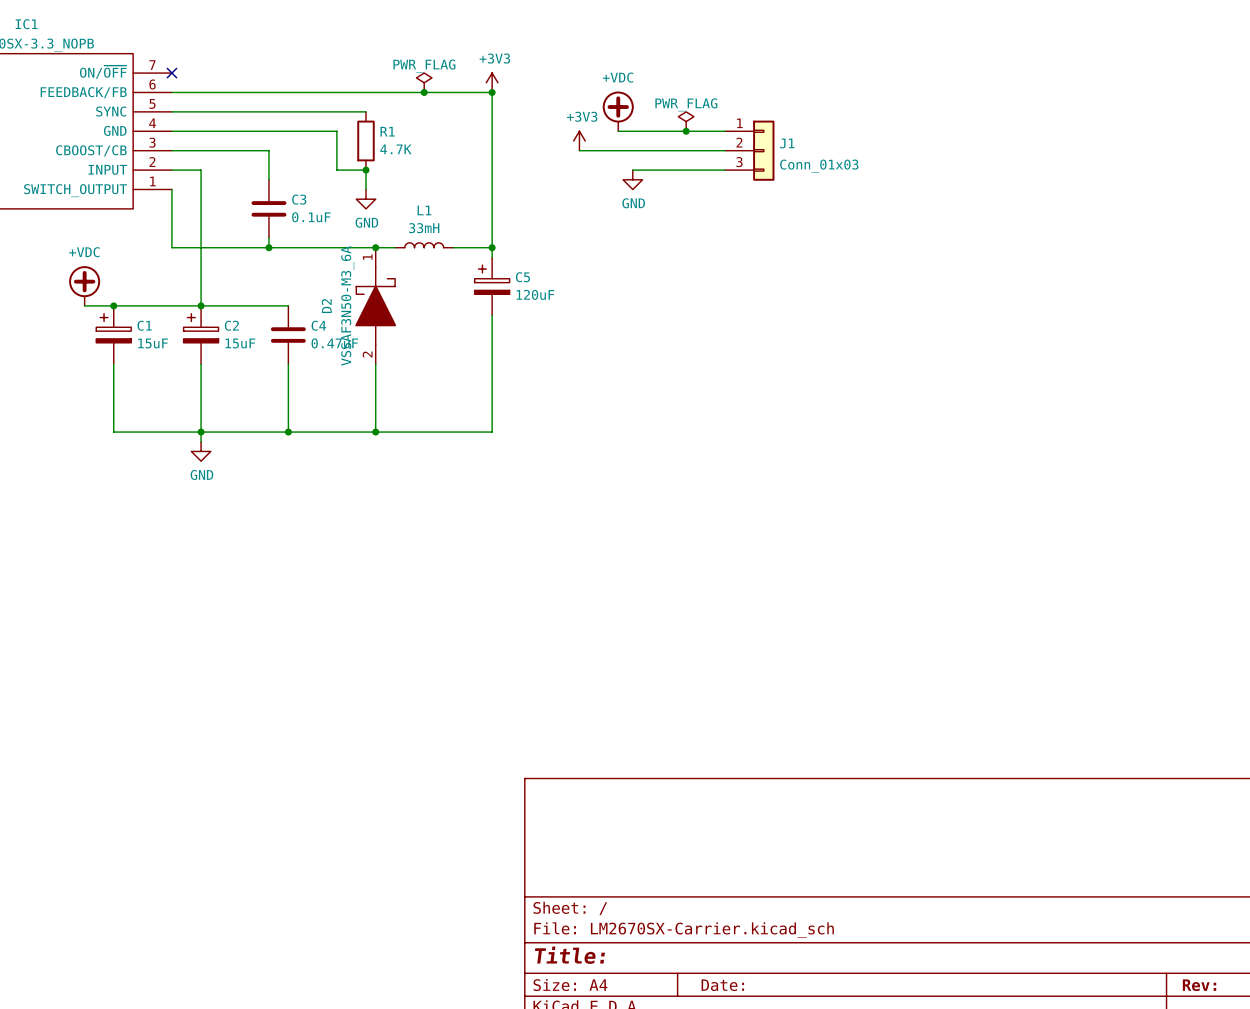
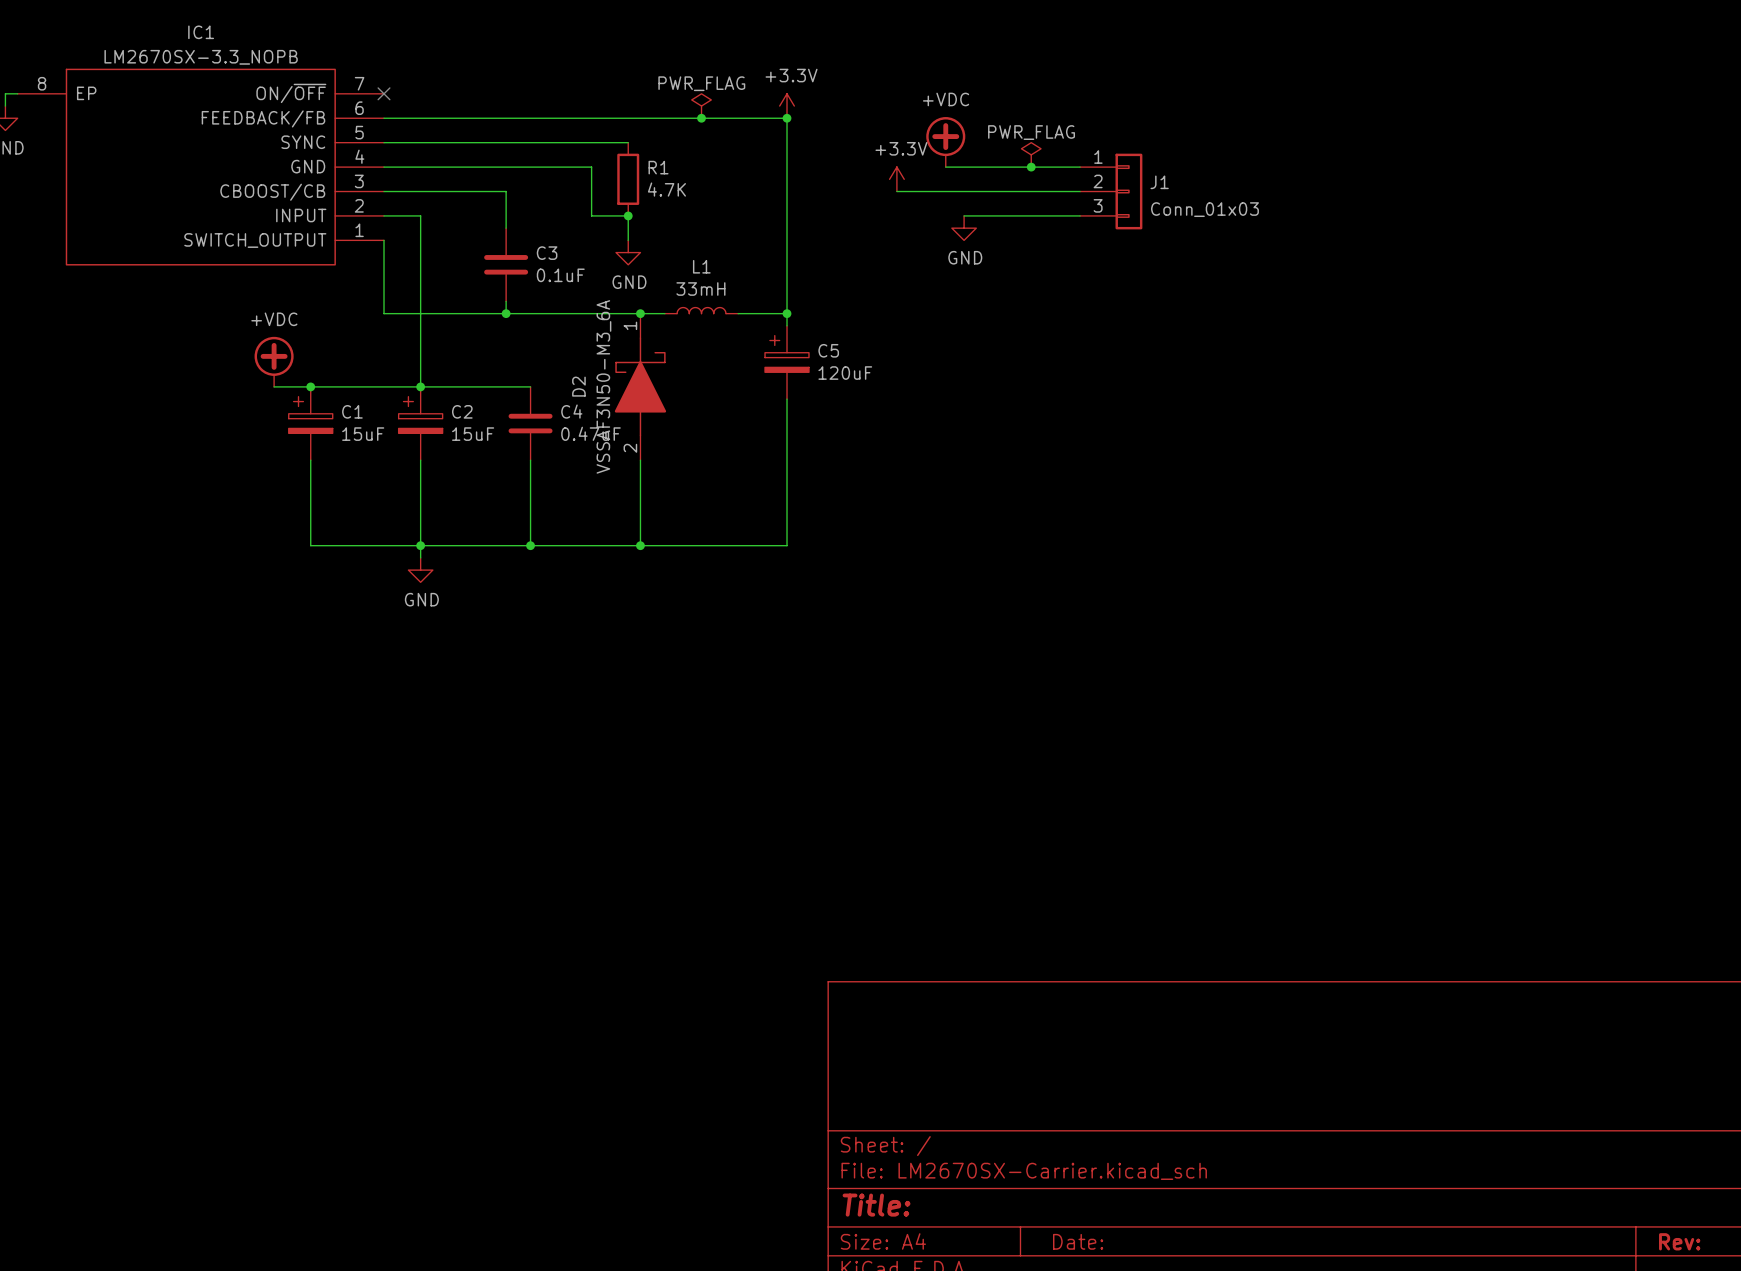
power symbol: +3V3 (492, 82) -> +3.3V (787, 106)
power symbol: +3V3 (579, 140) -> +3.3V (896, 179)

